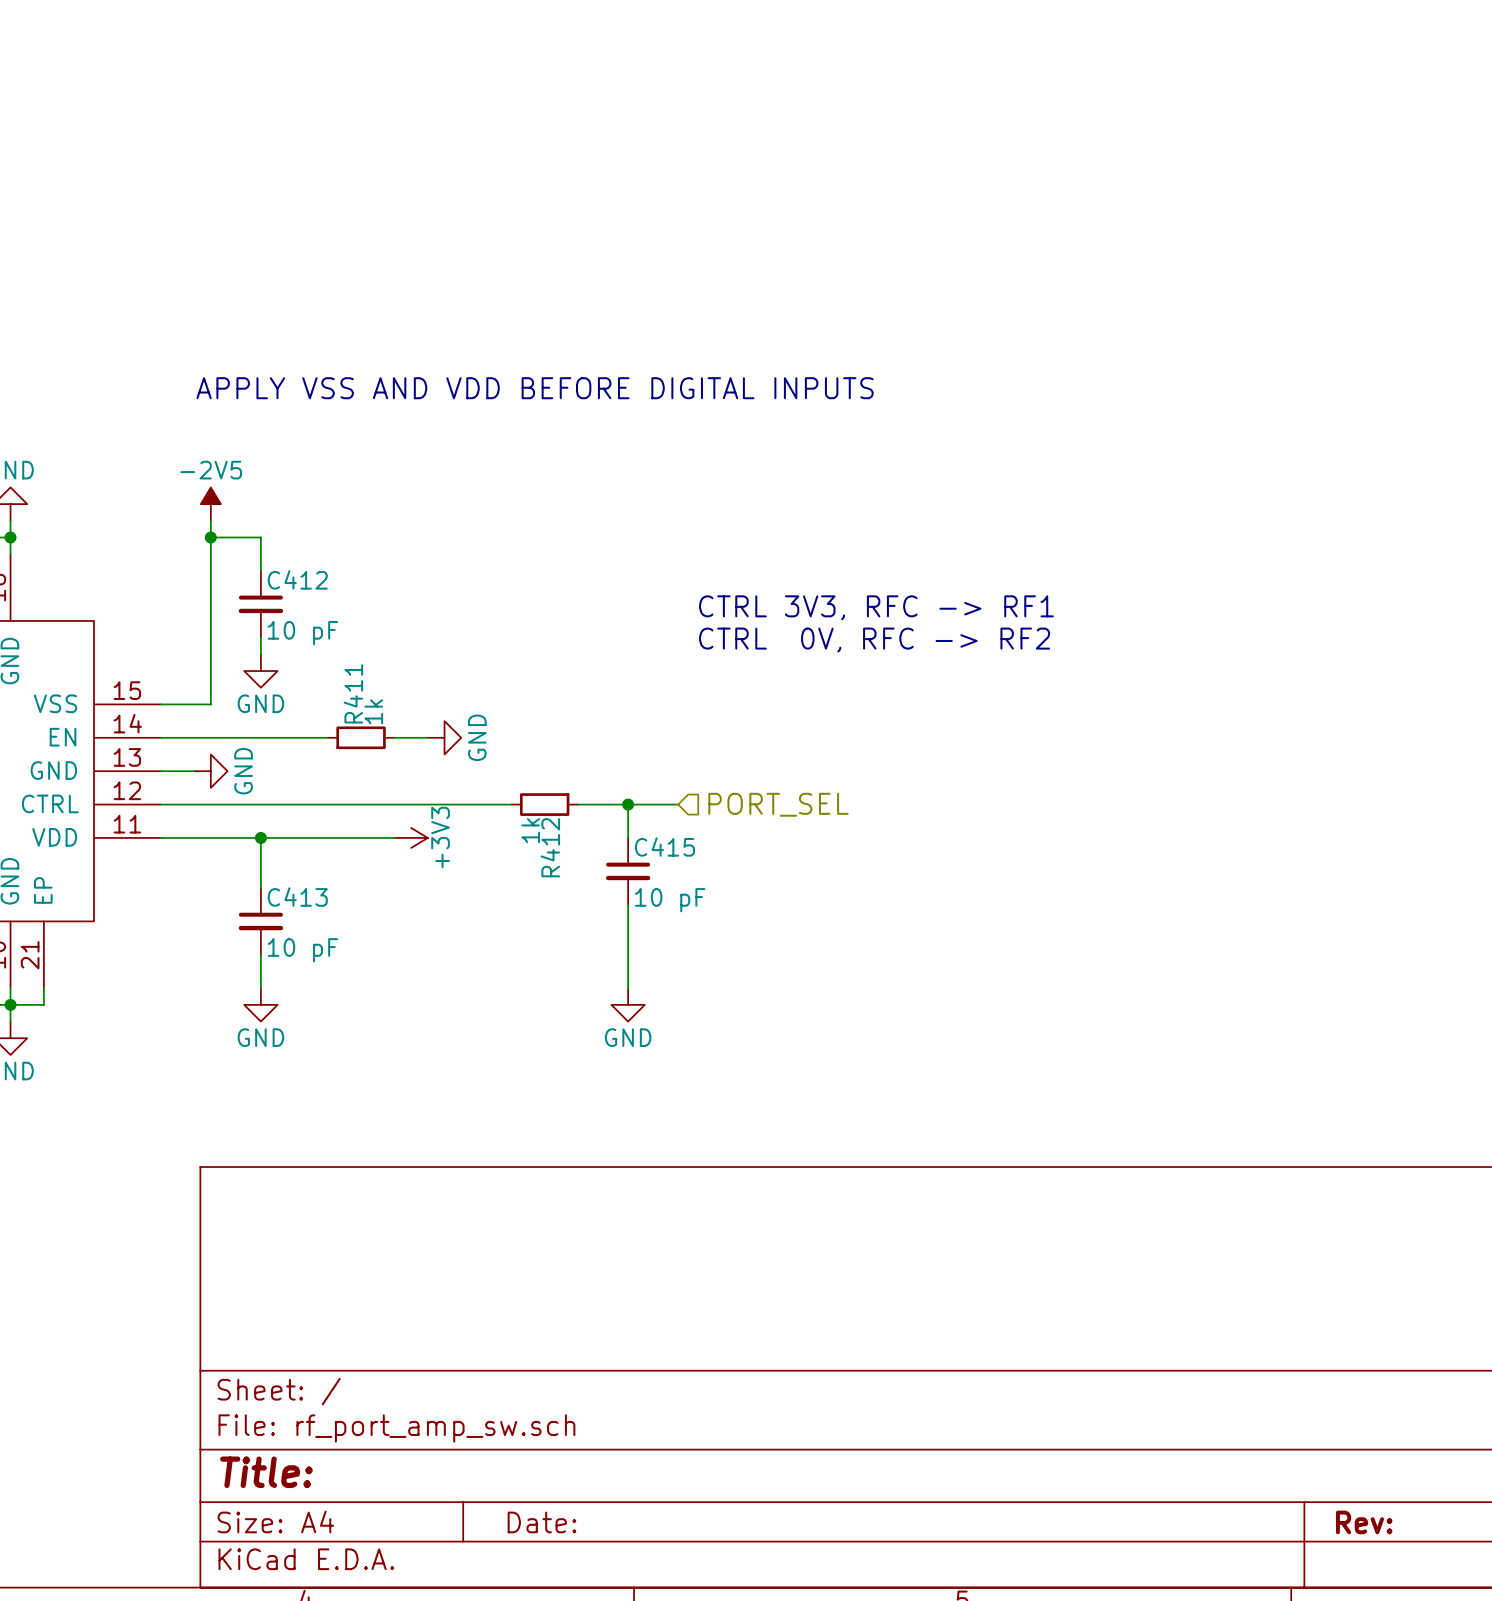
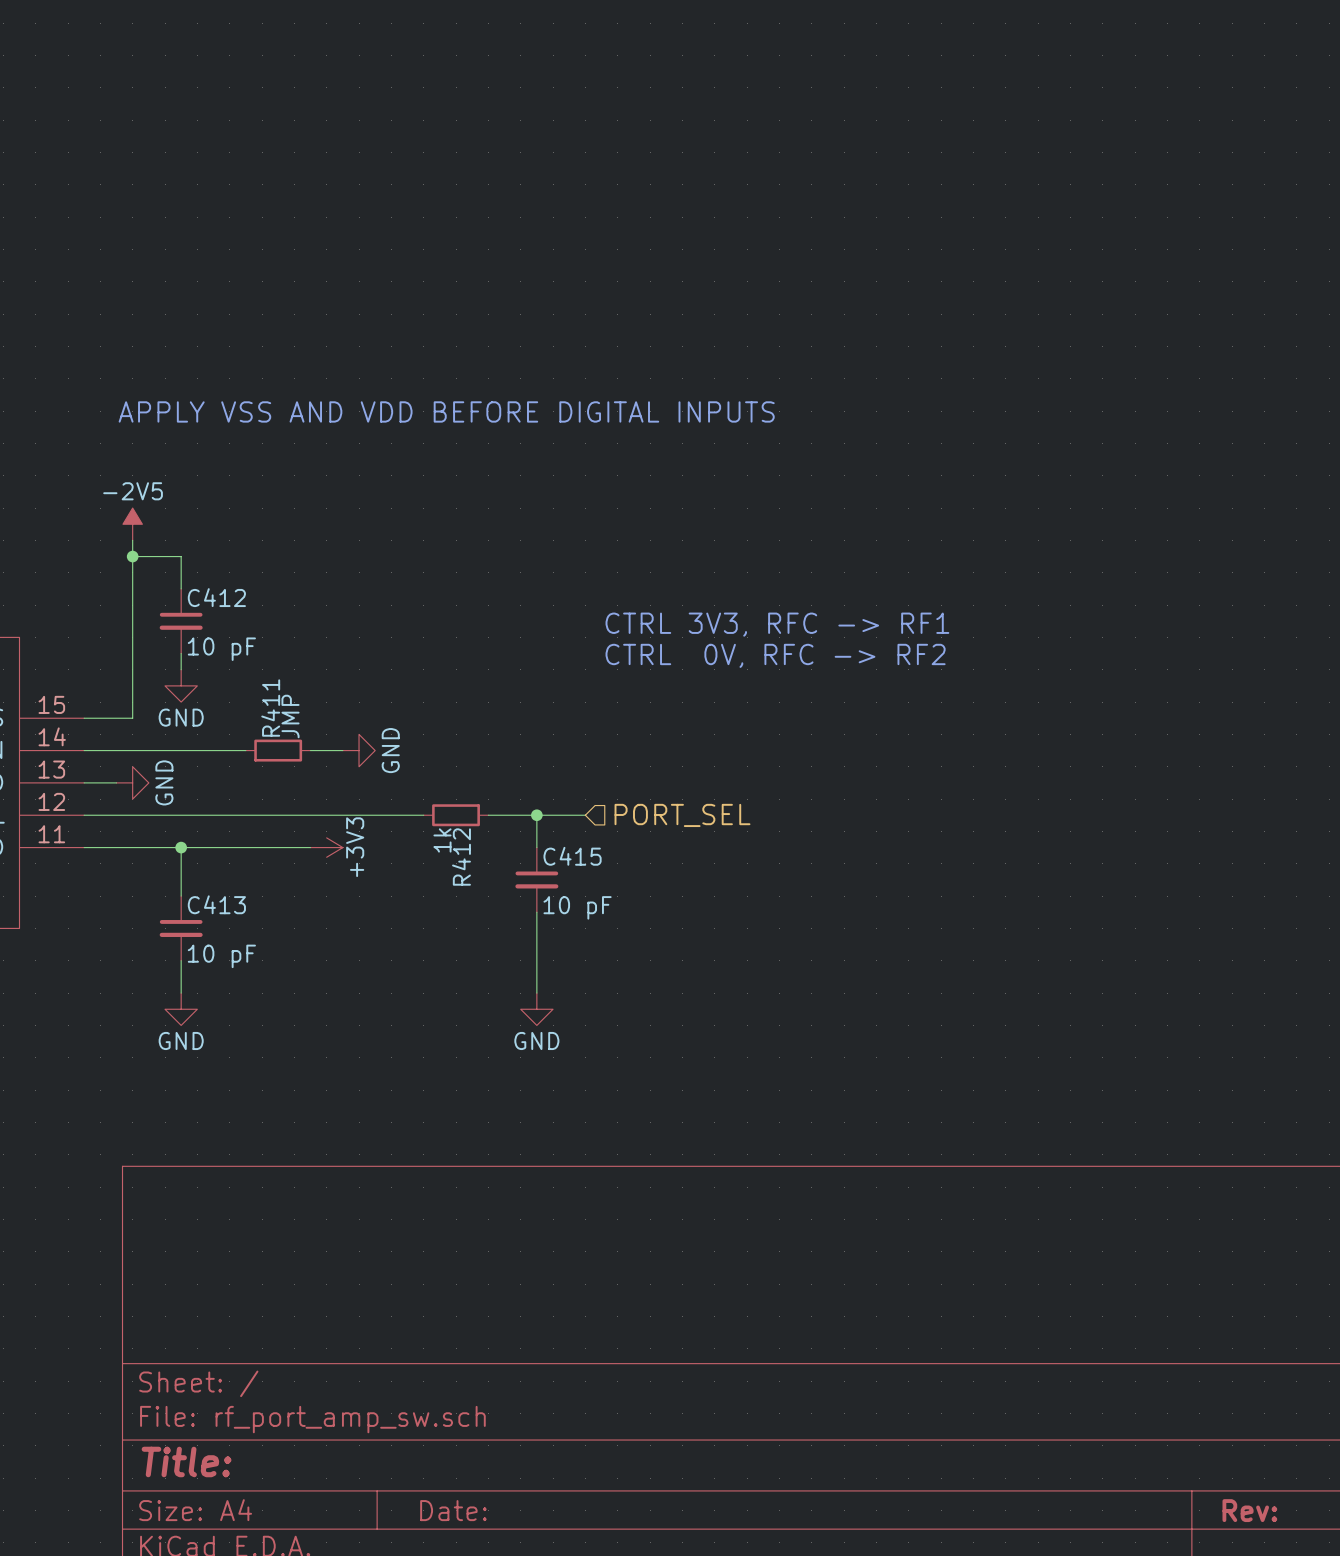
R411 value: 1k (373, 711) -> JMP (290, 716)

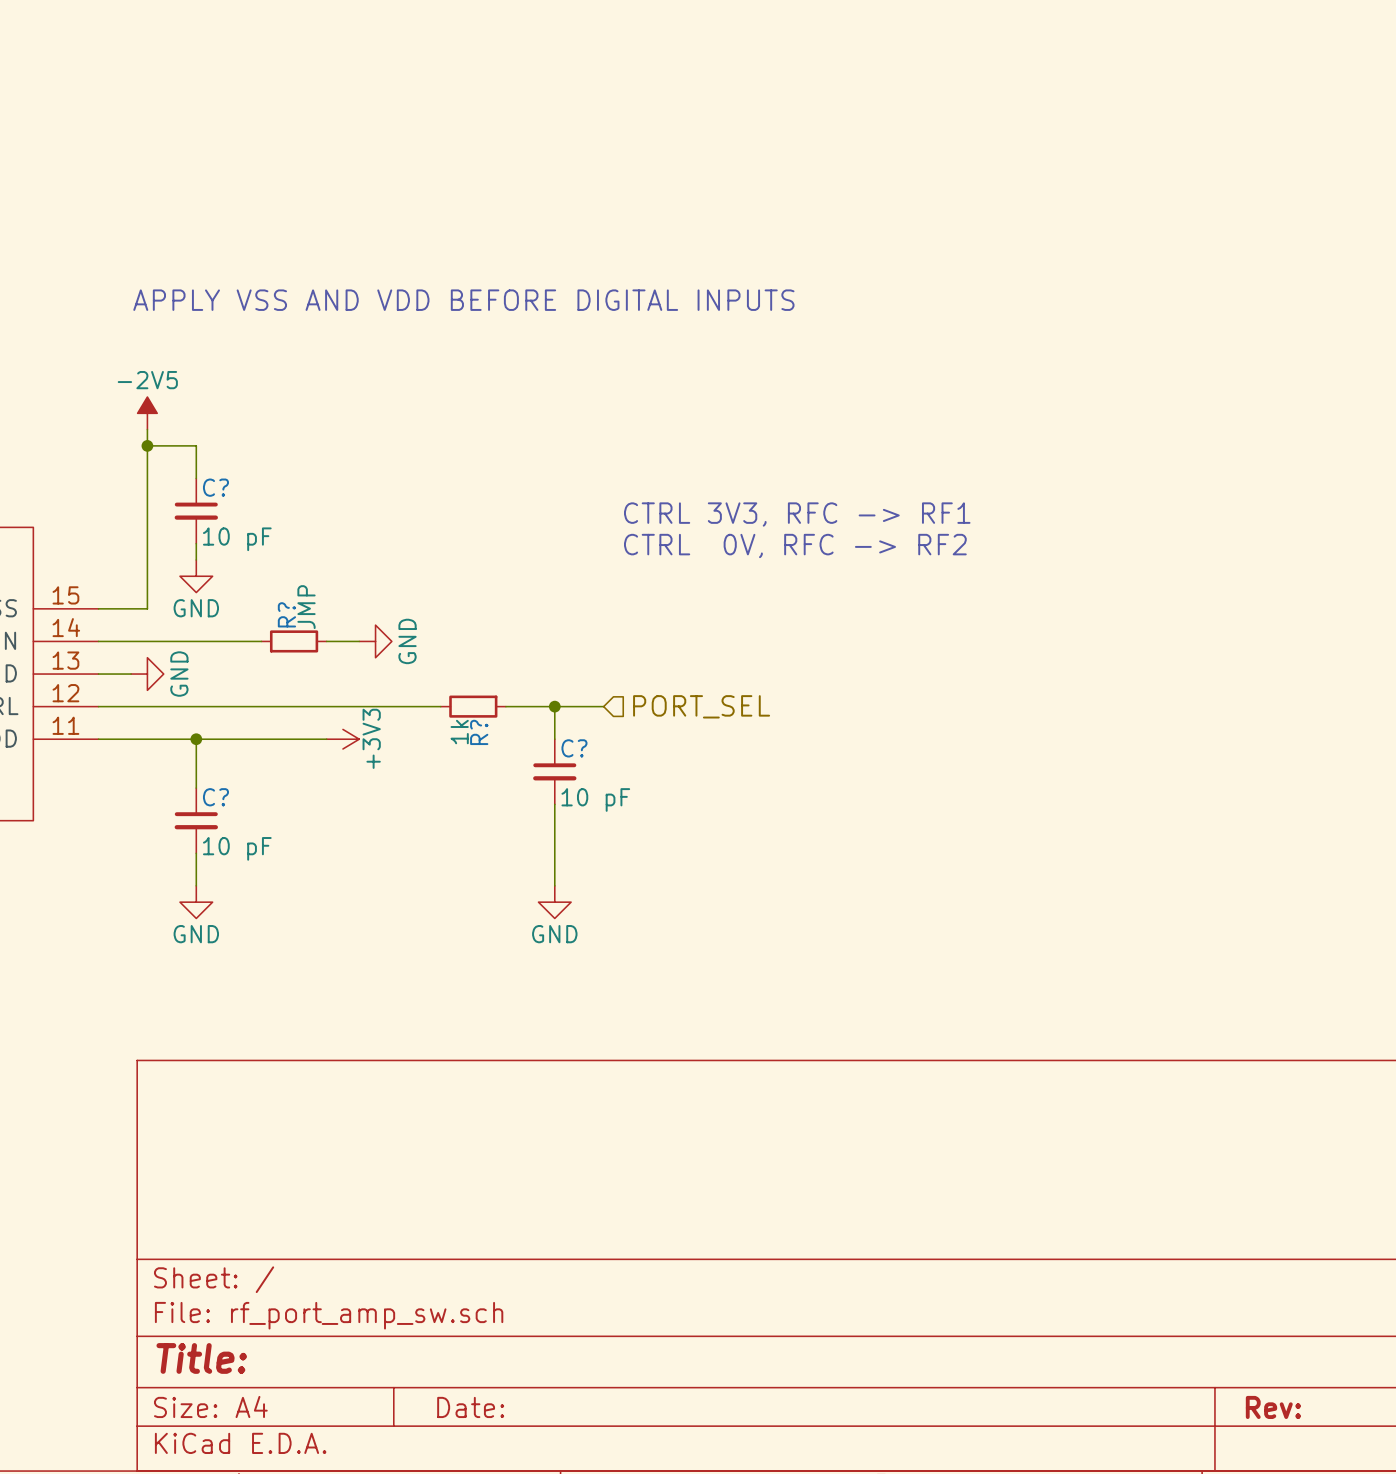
C412 name: C412 (216, 597) -> C? (215, 487)
R411 name: R411 (270, 708) -> R? (286, 614)
C415 name: C415 (572, 856) -> C? (574, 748)
R412 name: R412 (461, 857) -> R? (479, 732)
C413 name: C413 (216, 904) -> C? (215, 797)

